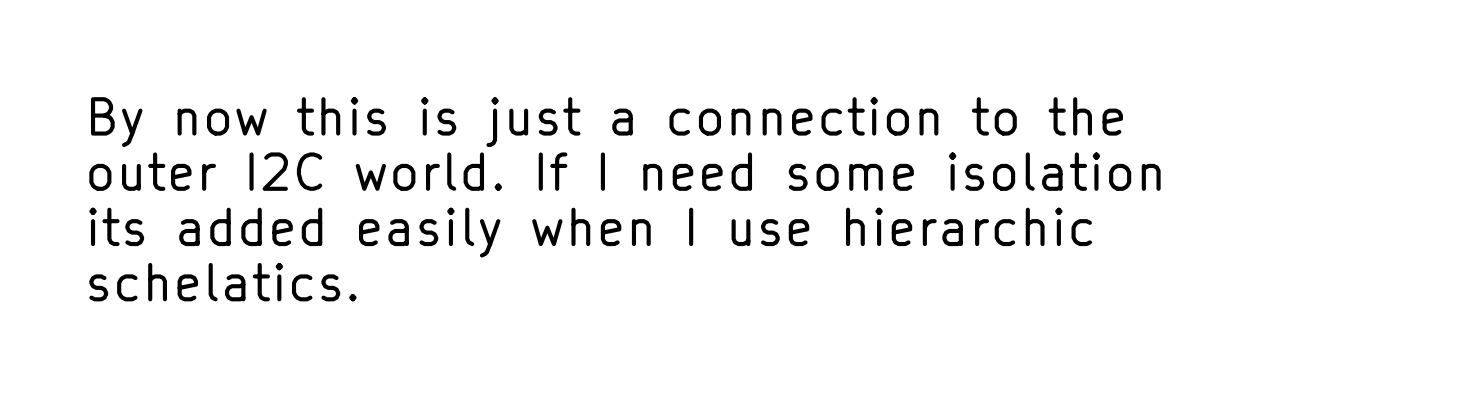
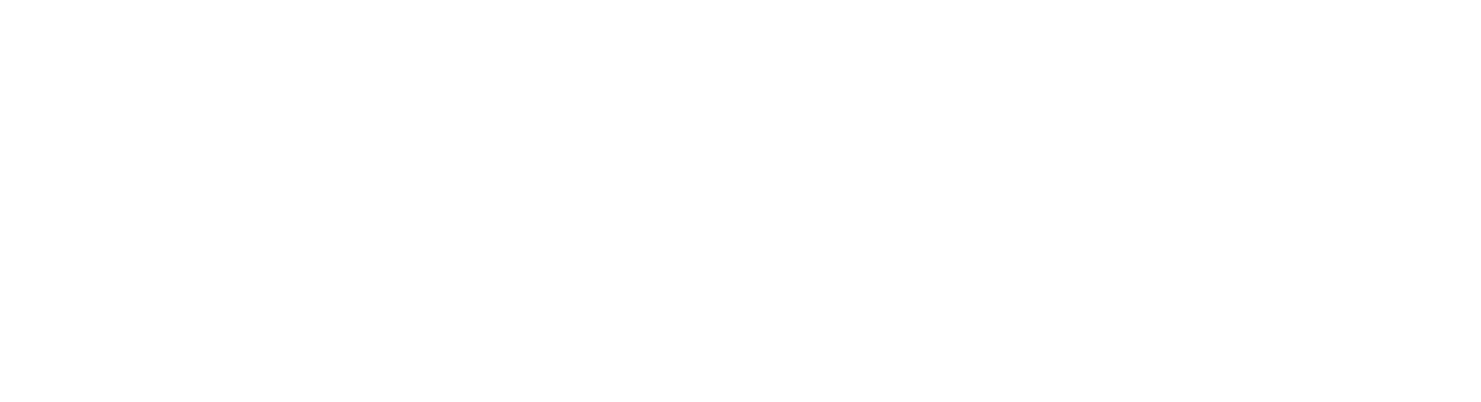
text: By now this is just a connection to the (606, 122) -> none
text: outer I2C world. If I need some isolation (624, 171) -> none
text: its added easily when I use hierarchic (590, 232) -> none
text: schelatics. (222, 282) -> none

